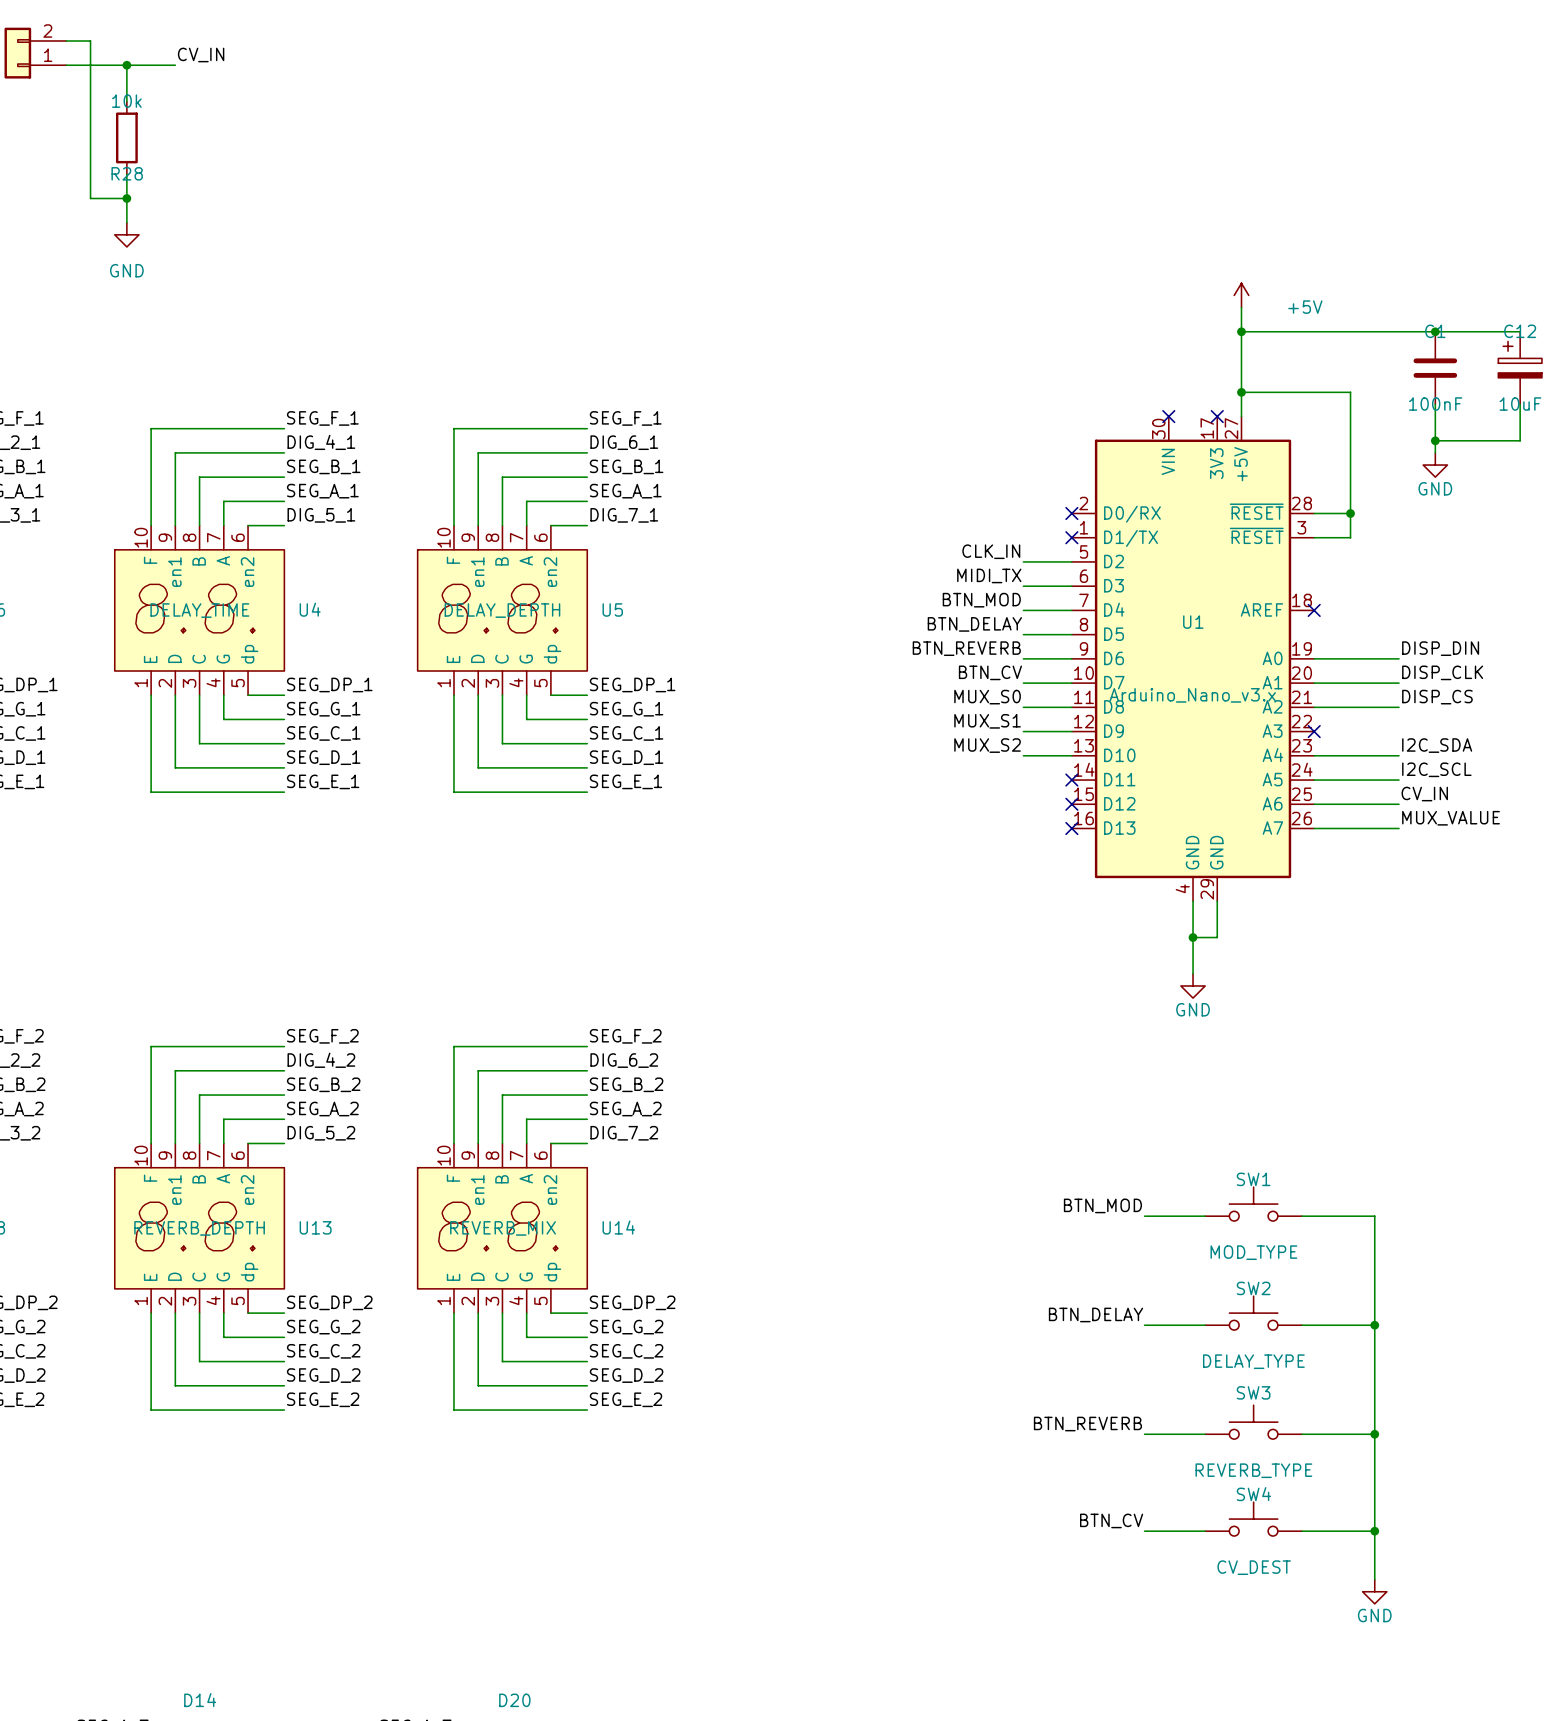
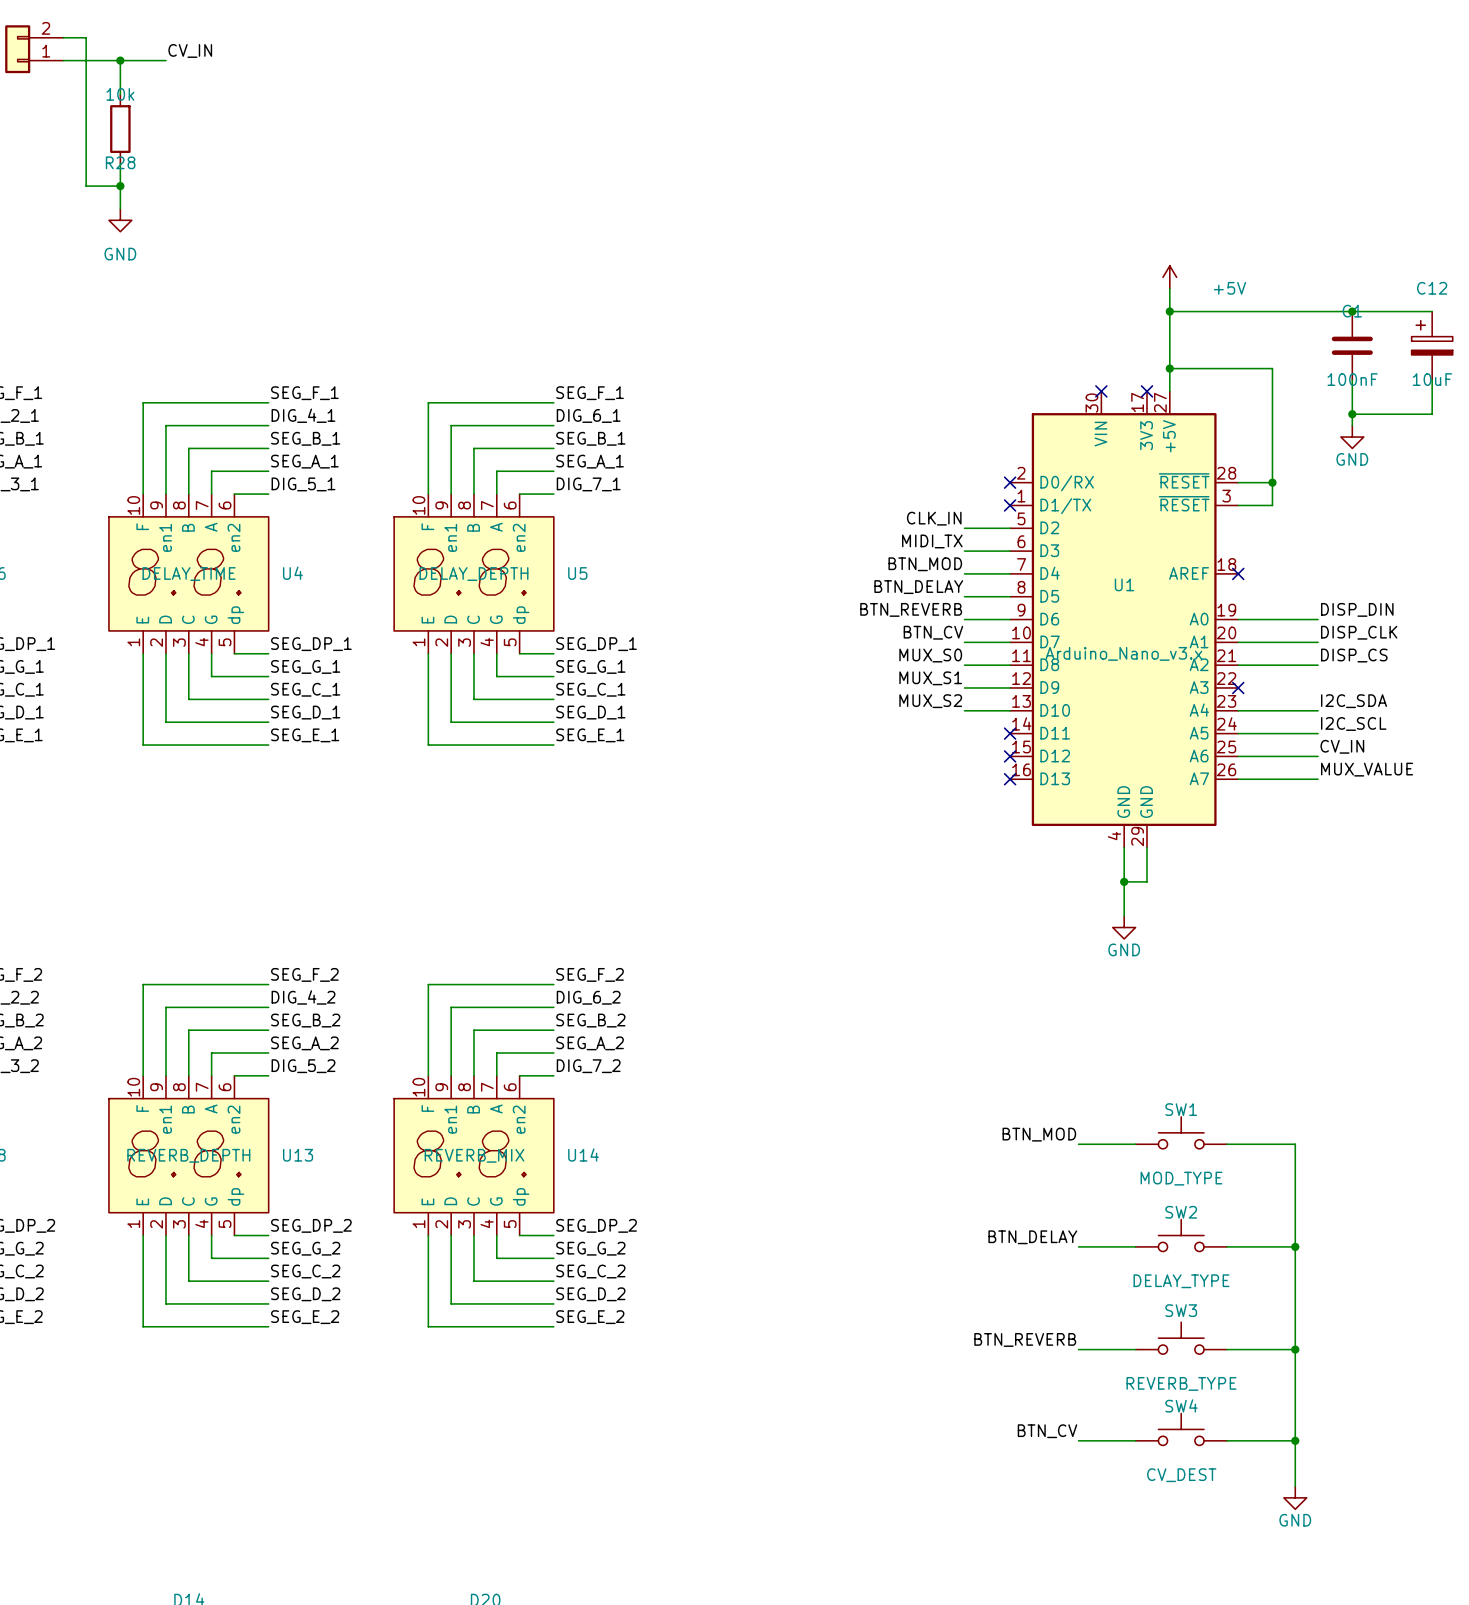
C12 name position: C12 (1520, 331) -> C12 (1432, 288)

